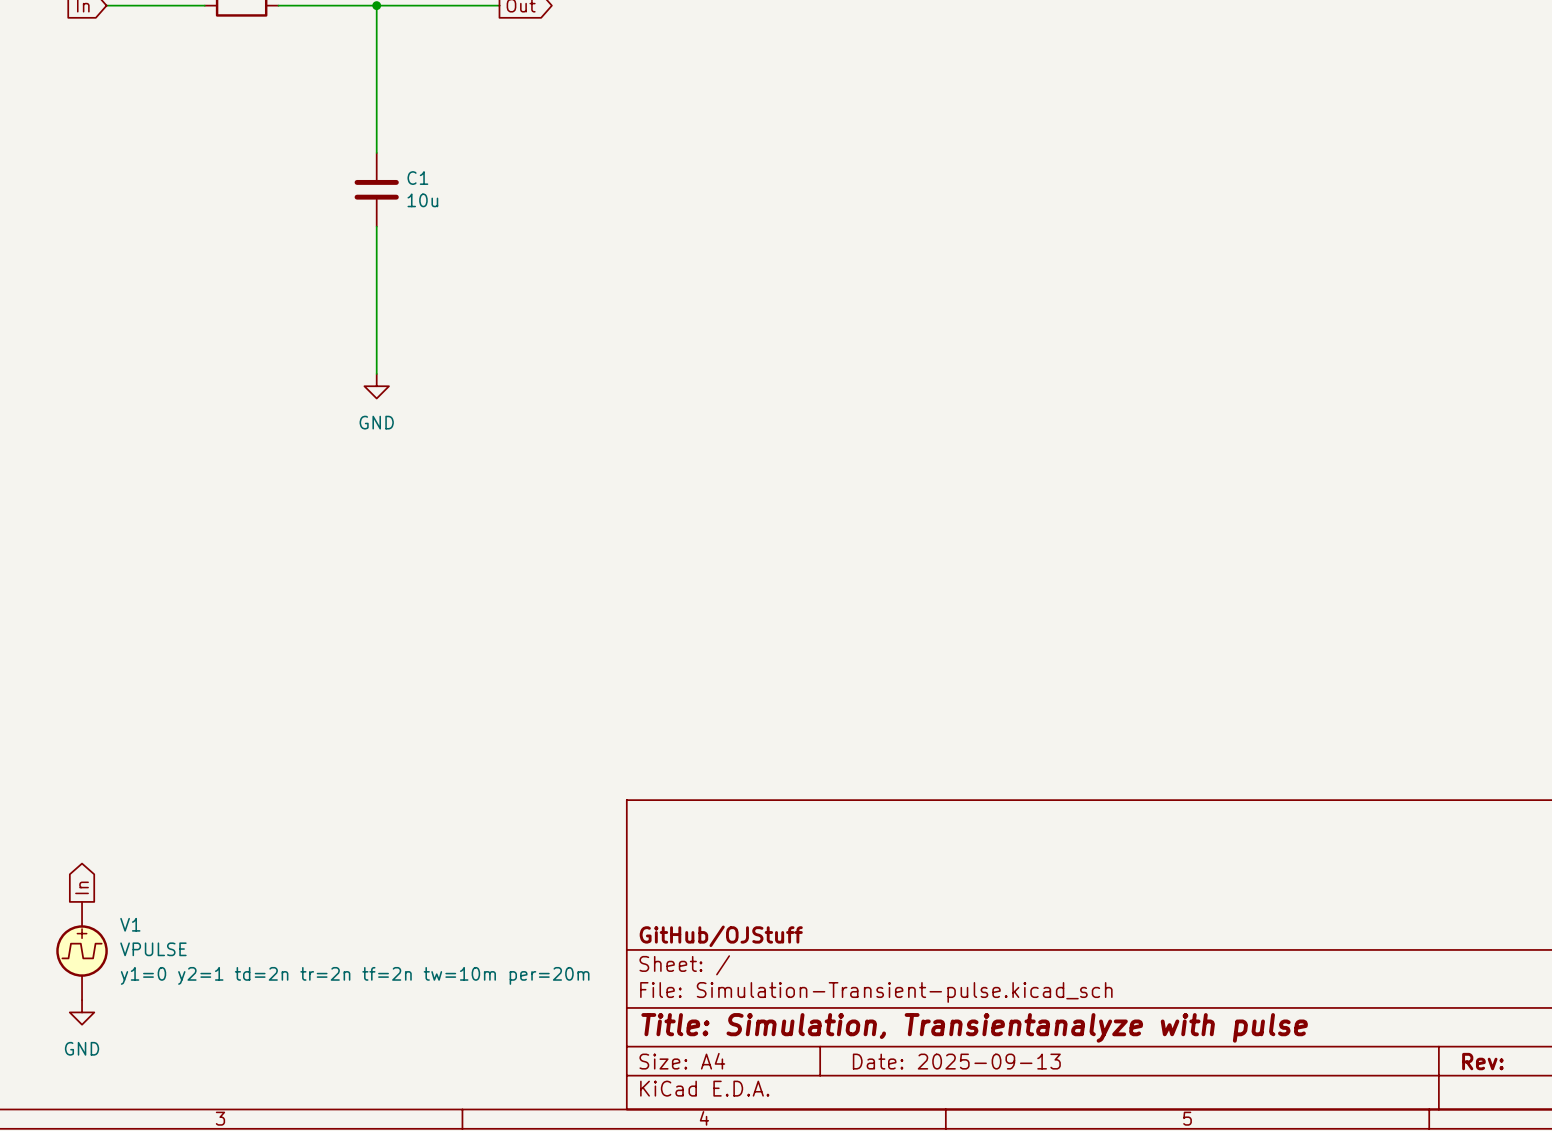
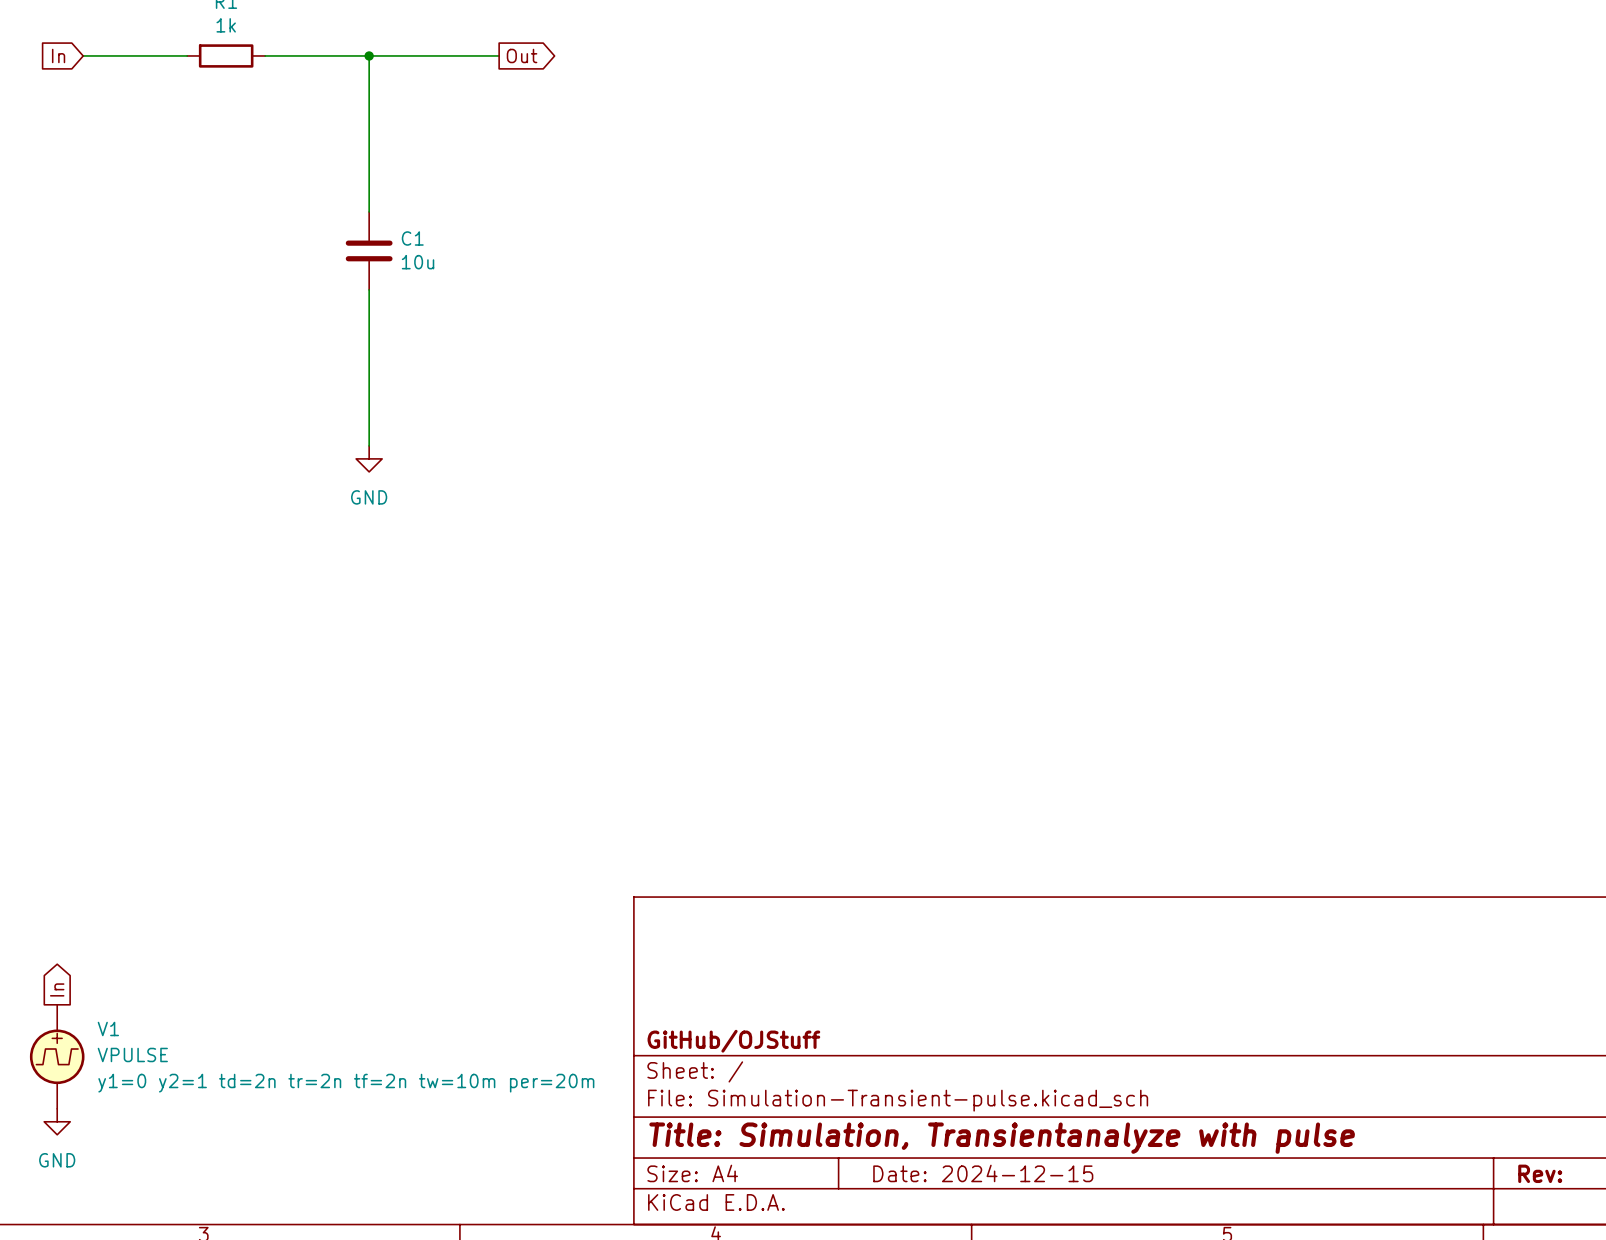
title block: Date: 2025-09-13 (956, 1061) -> Date: 2024-12-15 (983, 1173)

